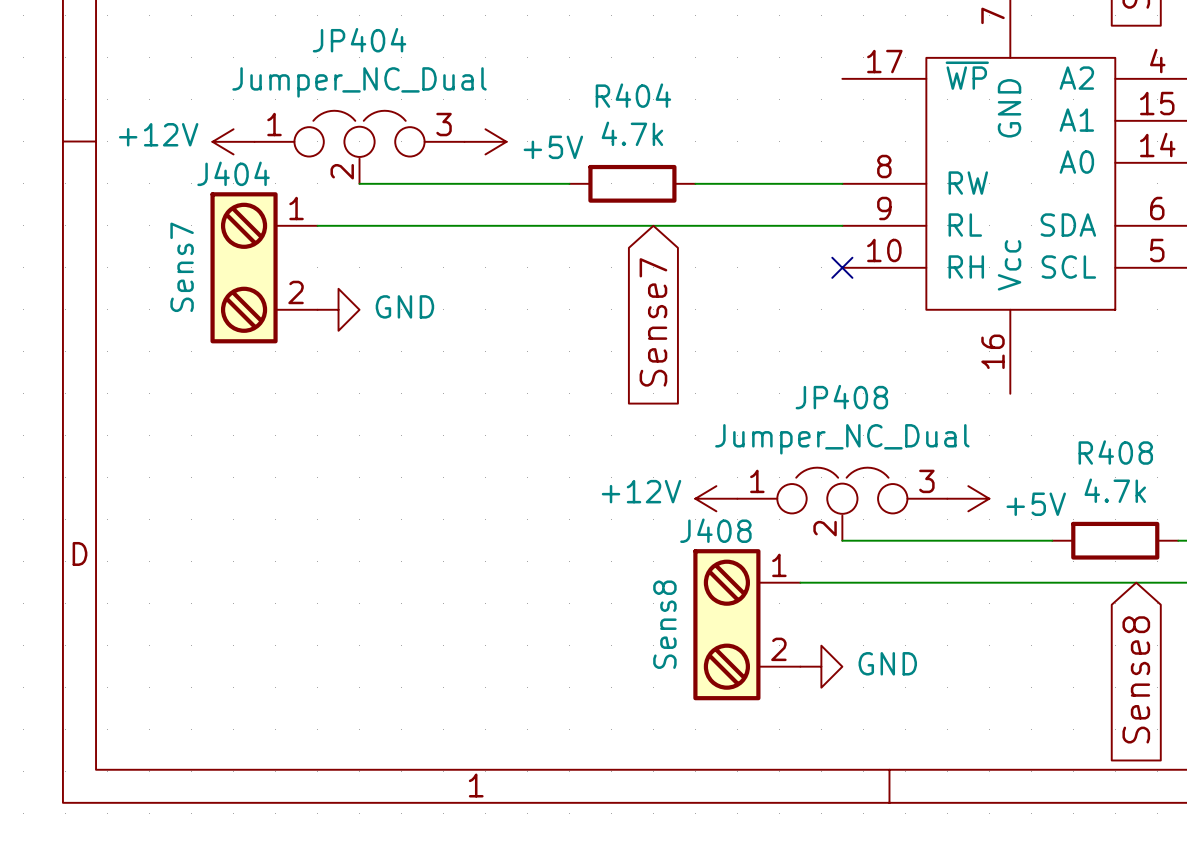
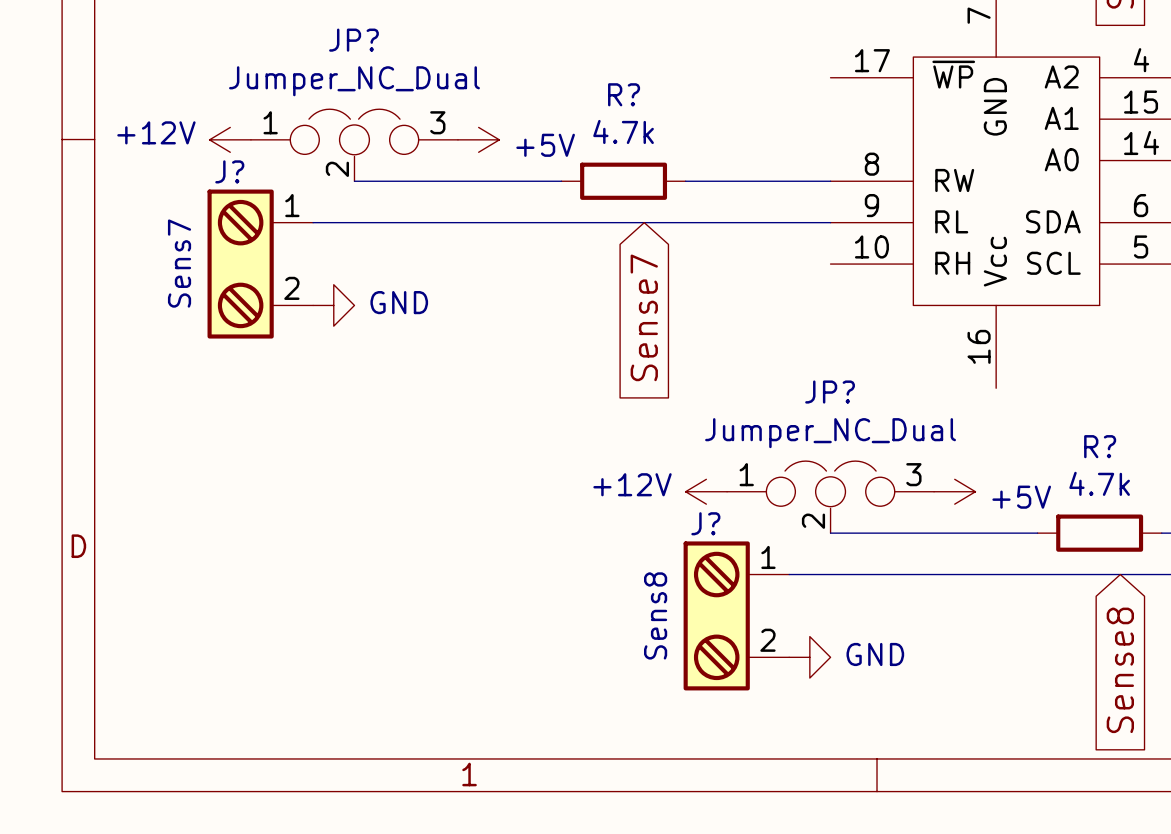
JP404 name: JP404 (359, 40) -> JP? (353, 40)
R404 name: R404 (633, 95) -> R? (624, 94)
J404 name: J404 (233, 173) -> J? (229, 171)
no-connect mark: (842, 267) -> none
JP408 name: JP408 (841, 397) -> JP? (830, 392)
R408 name: R408 (1115, 452) -> R? (1100, 446)
J408 name: J408 (715, 530) -> J? (705, 523)

